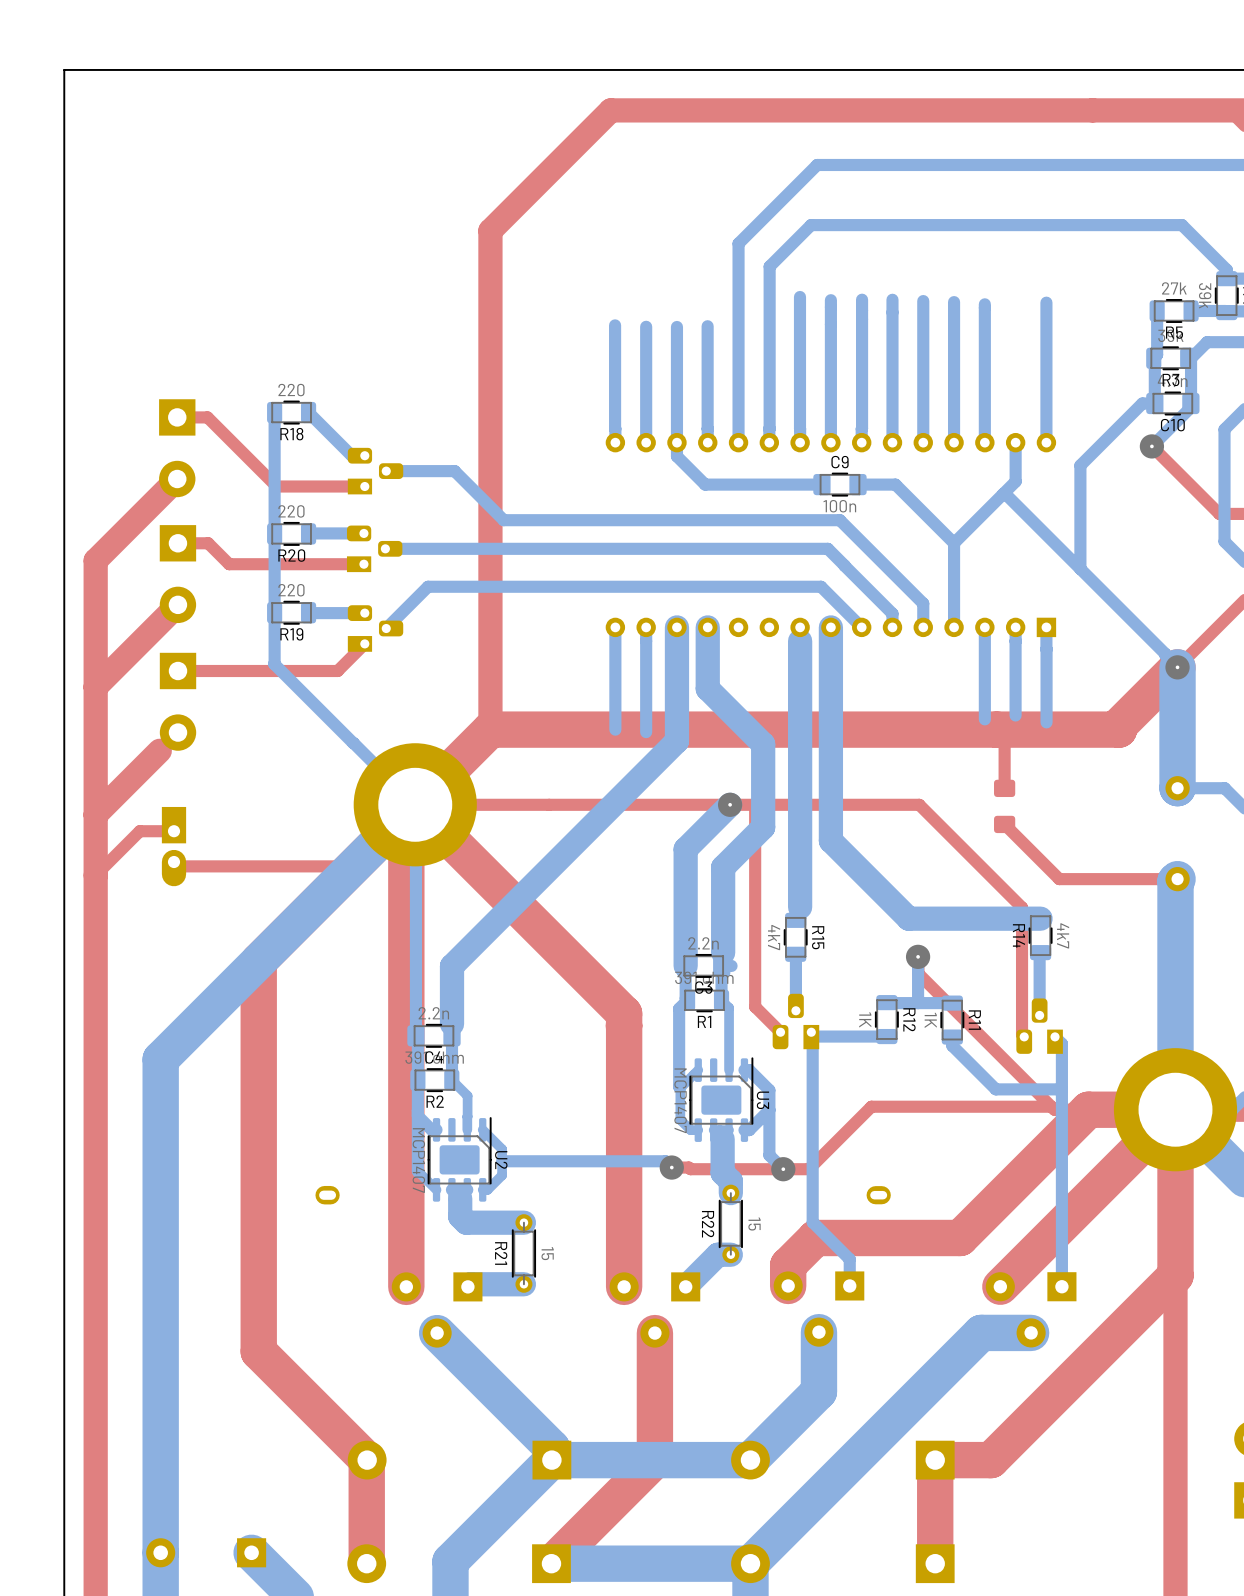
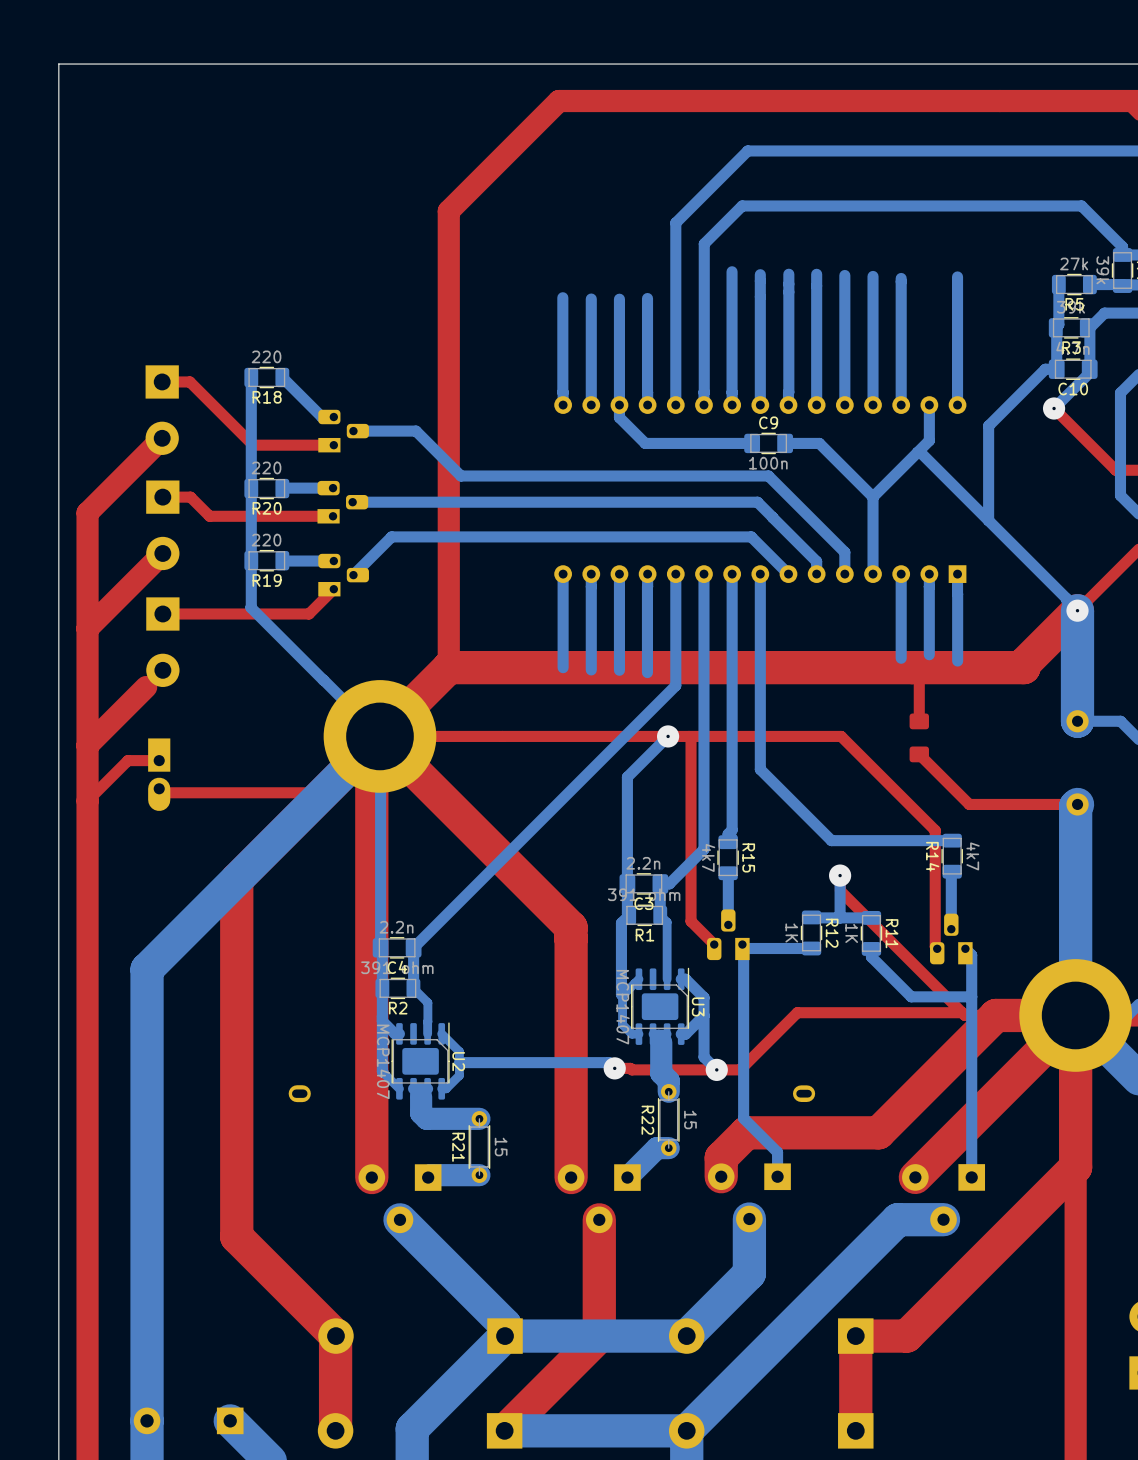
bottom track width: thick (676, 627) (676, 732) -> thin (619, 574) (619, 670)
bottom track: (707, 627) (707, 688) (763, 744) (763, 827) (723, 867) (721, 965) -> none
bottom track: none -> (703, 574) (703, 849) (669, 883)
bottom track width: thick (830, 627) (830, 840) (908, 918) (1040, 918) -> thin (760, 574) (760, 769) (831, 840) (952, 840)
bottom track: none -> (647, 586) (647, 672)
bottom track width: thick (800, 641) (800, 907) -> thin (732, 586) (732, 830)
bottom track: (676, 732) (676, 741) (452, 966) (452, 1035) -> (675, 574) (675, 685) (413, 947)
bottom track width: thick (730, 804) (685, 849) (685, 965) -> thin (668, 736) (627, 777) (627, 883)

